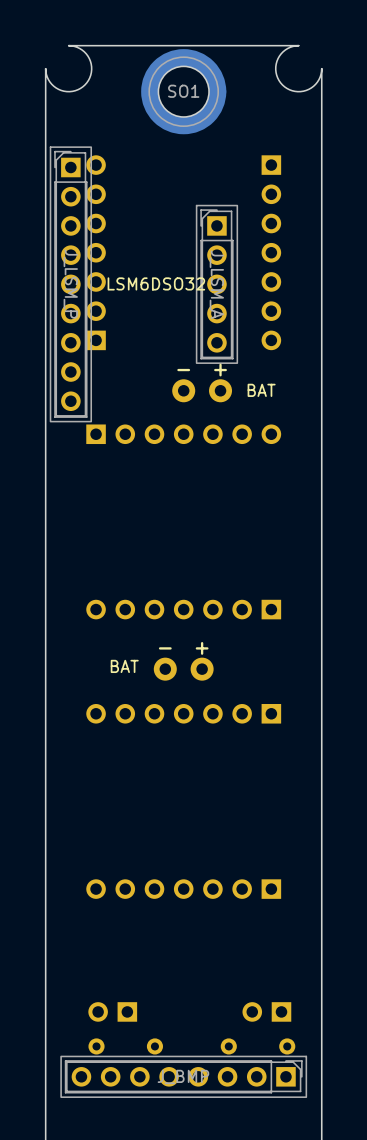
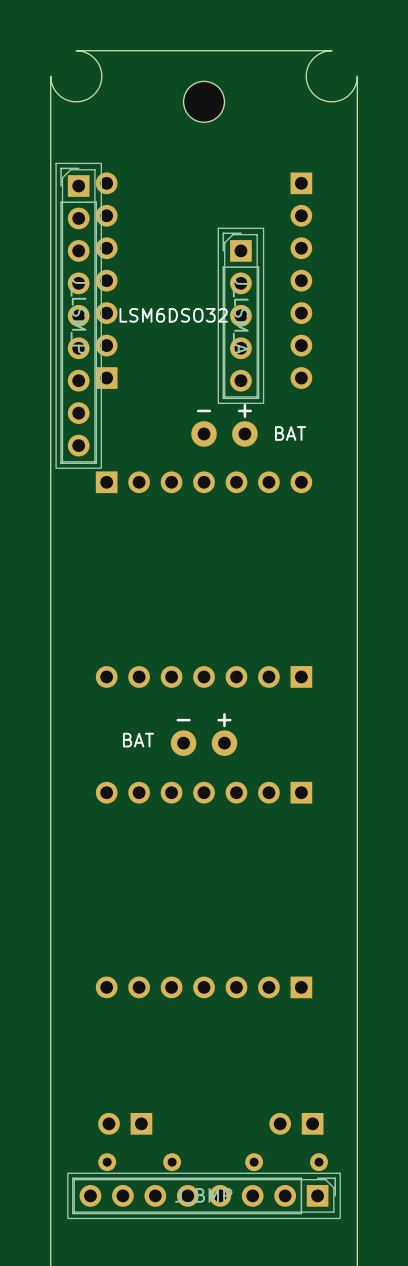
SO1: (183, 91) -> none
part: none -> (204, 101)

